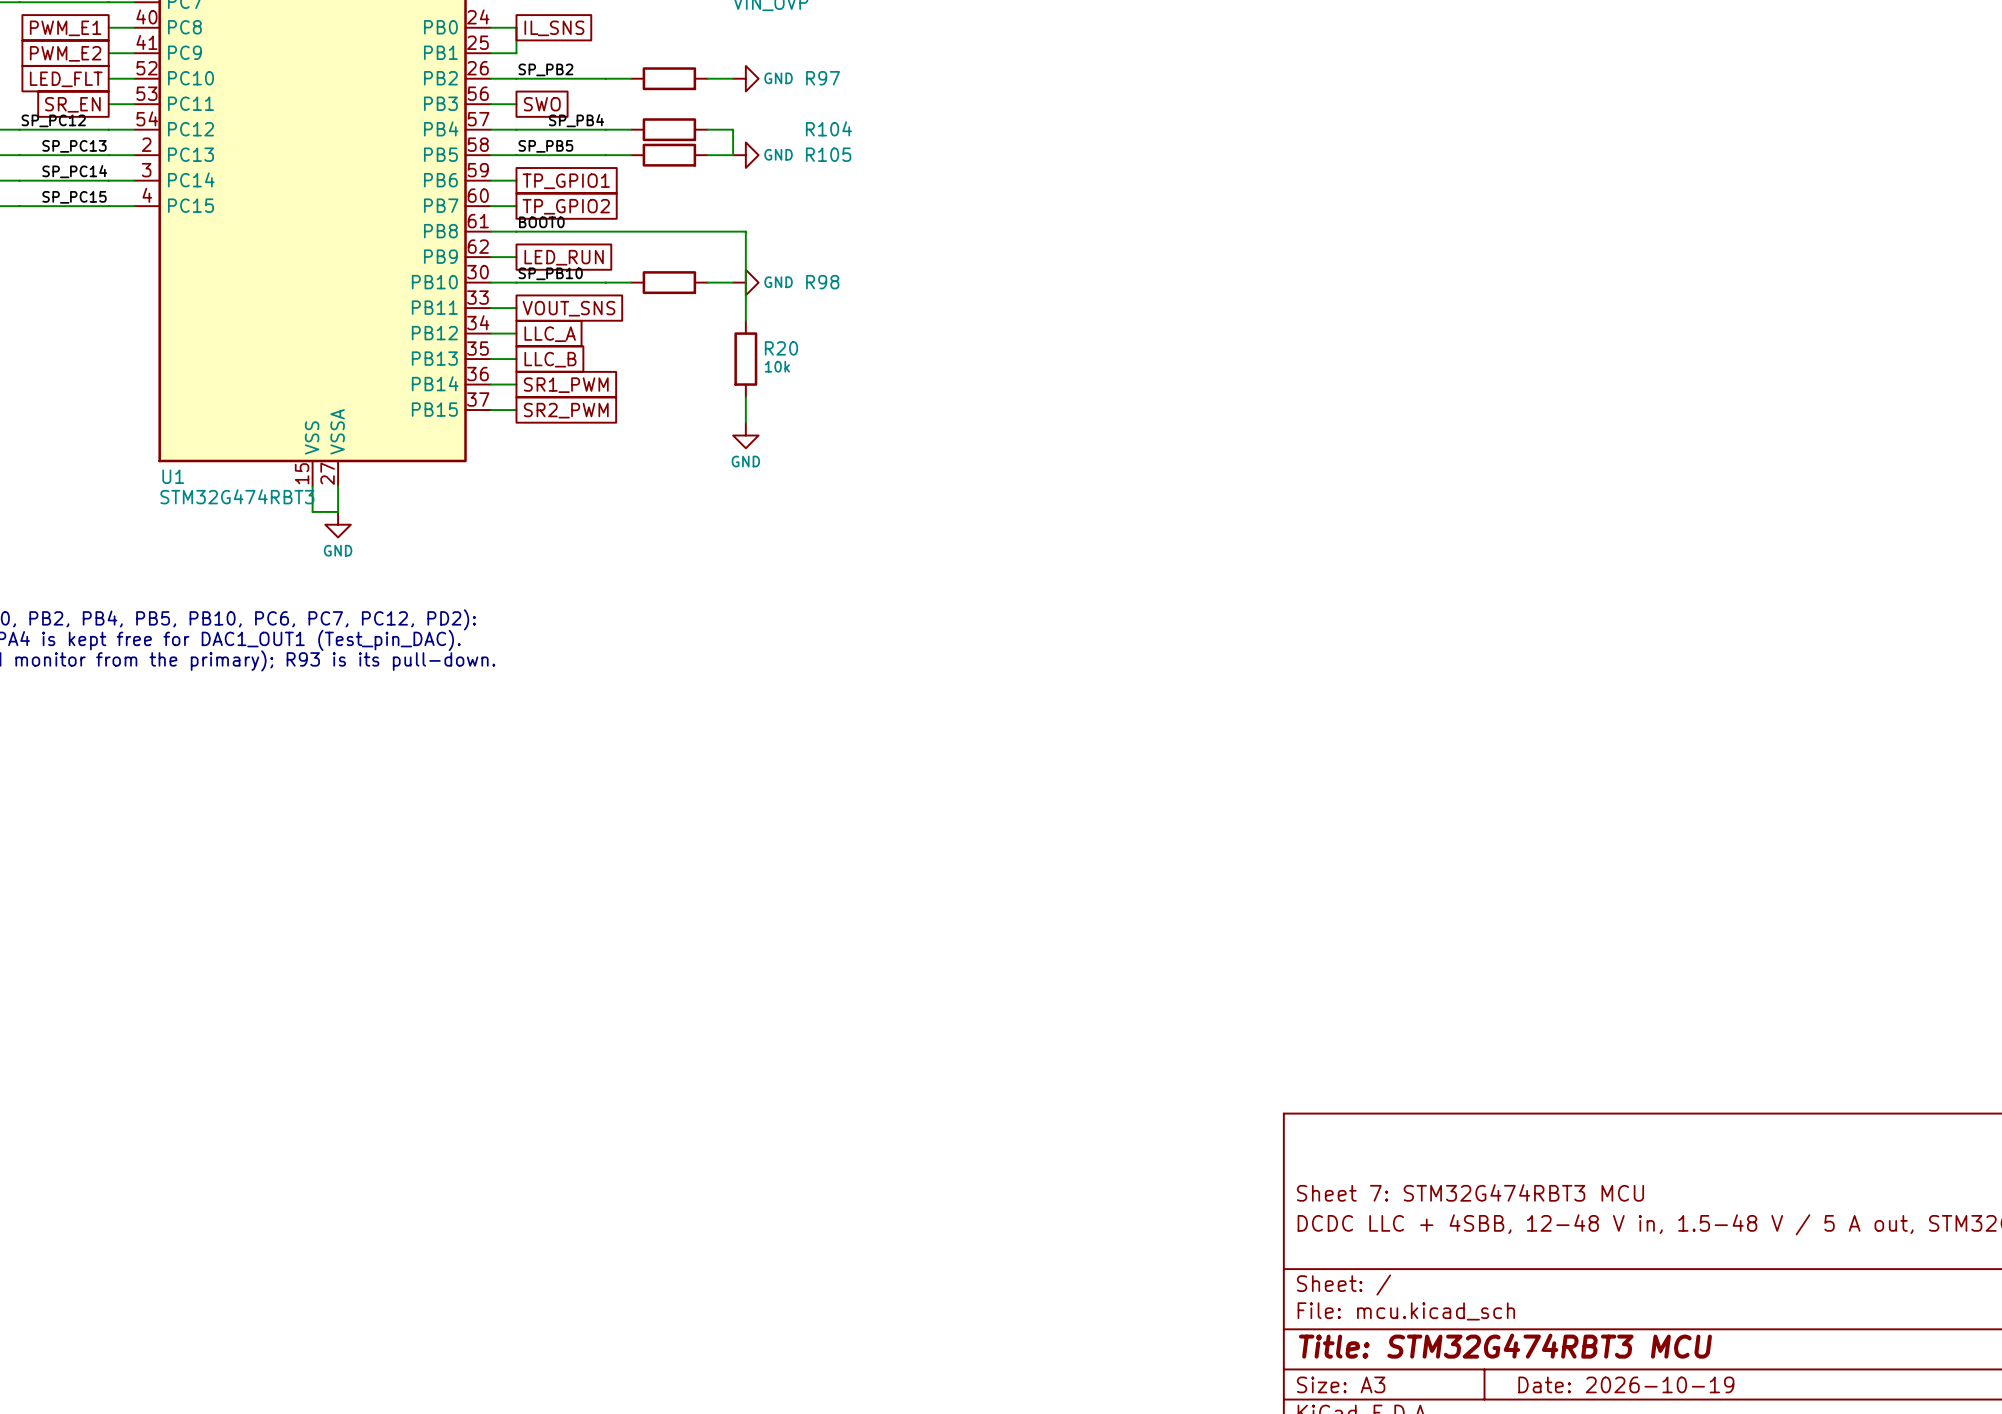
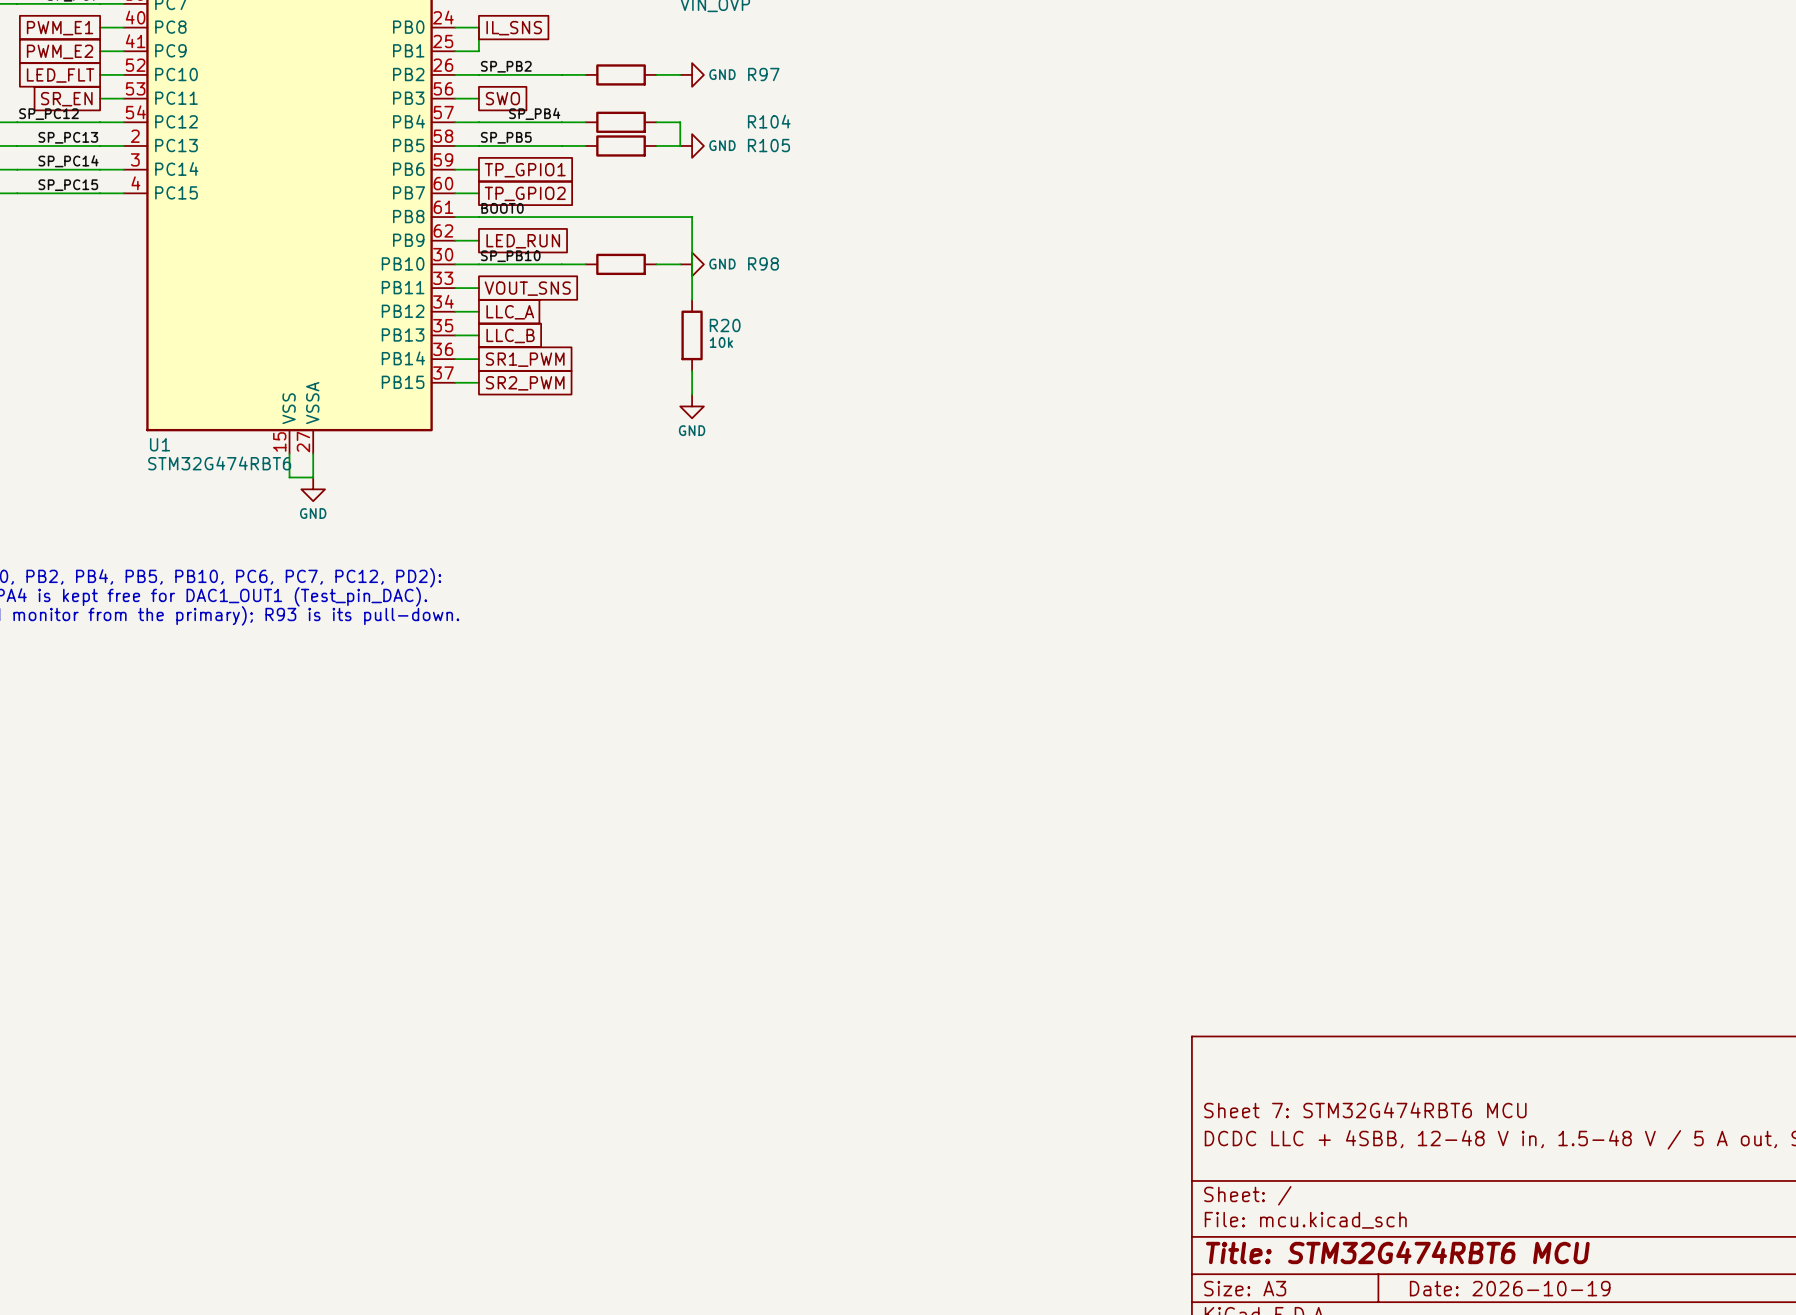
U1 value: STM32G474RBT3 (237, 496) -> STM32G474RBT6 (219, 463)
title block: Sheet 7: STM32G474RBT3 MCU (1470, 1192) -> Sheet 7: STM32G474RBT6 MCU (1365, 1110)
title block: Title: STM32G474RBT3 MCU (1505, 1346) -> Title: STM32G474RBT6 MCU (1397, 1252)

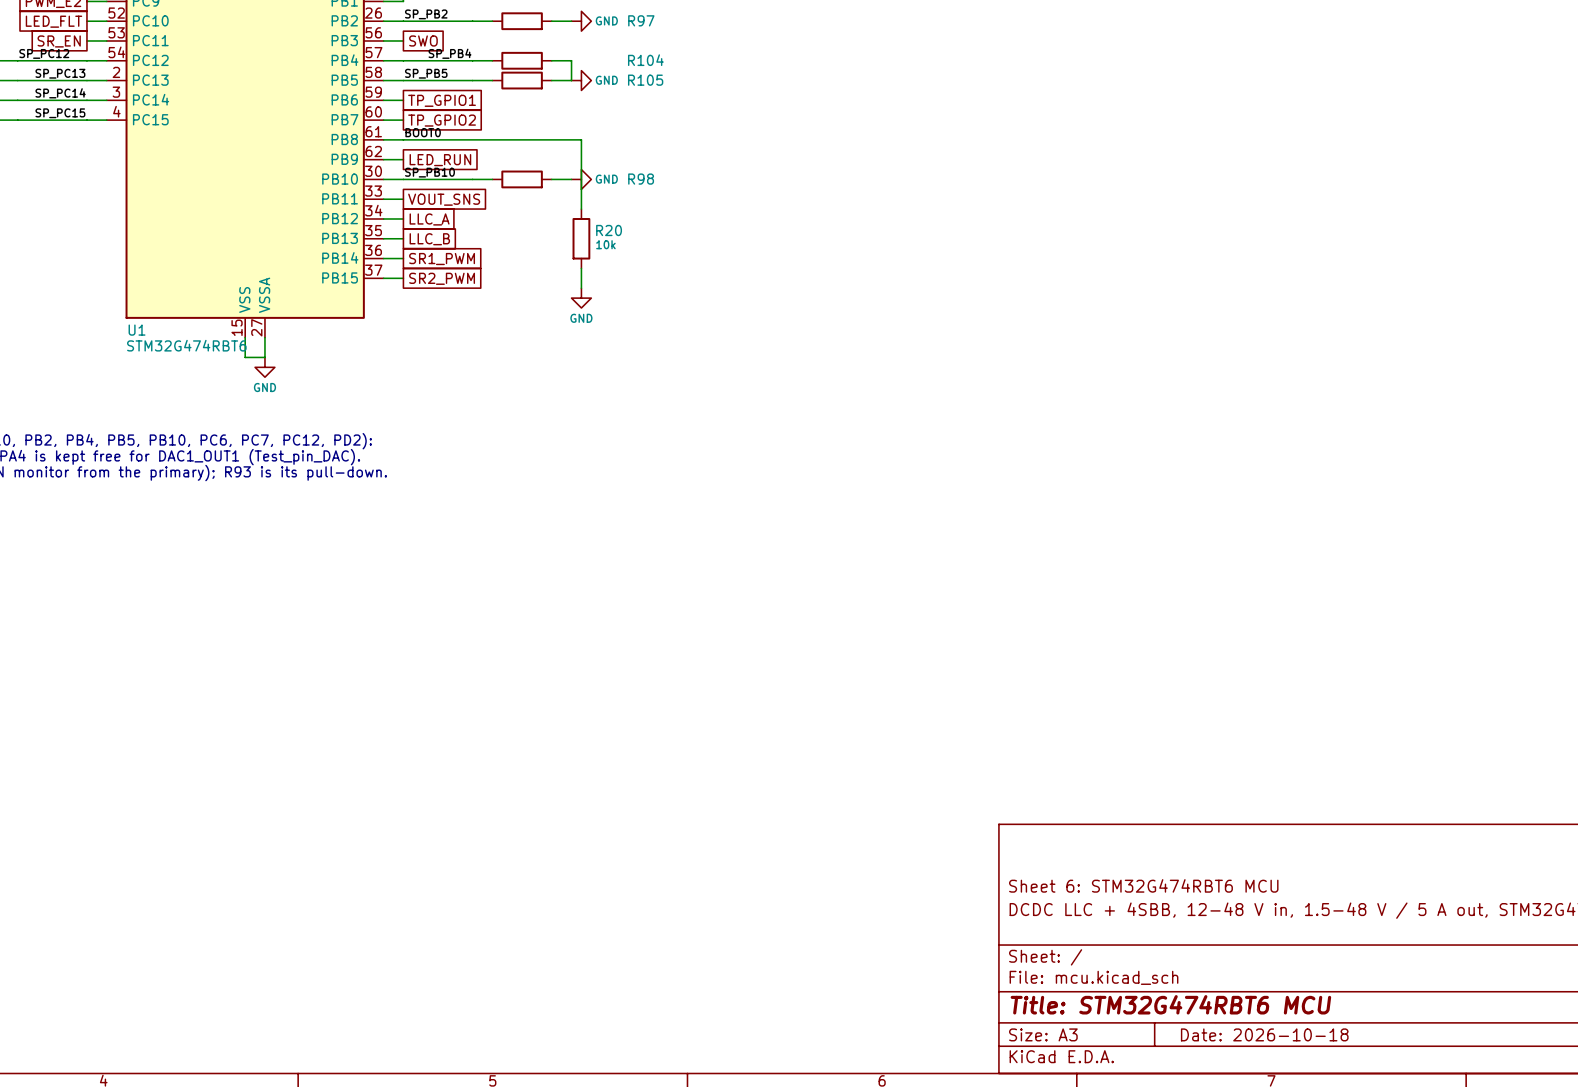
title block: Sheet 7: STM32G474RBT6 MCU (1365, 1110) -> Sheet 6: STM32G474RBT6 MCU (1143, 885)
title block: Date: 2026-10-19 (1510, 1288) -> Date: 2026-10-18 (1264, 1034)

